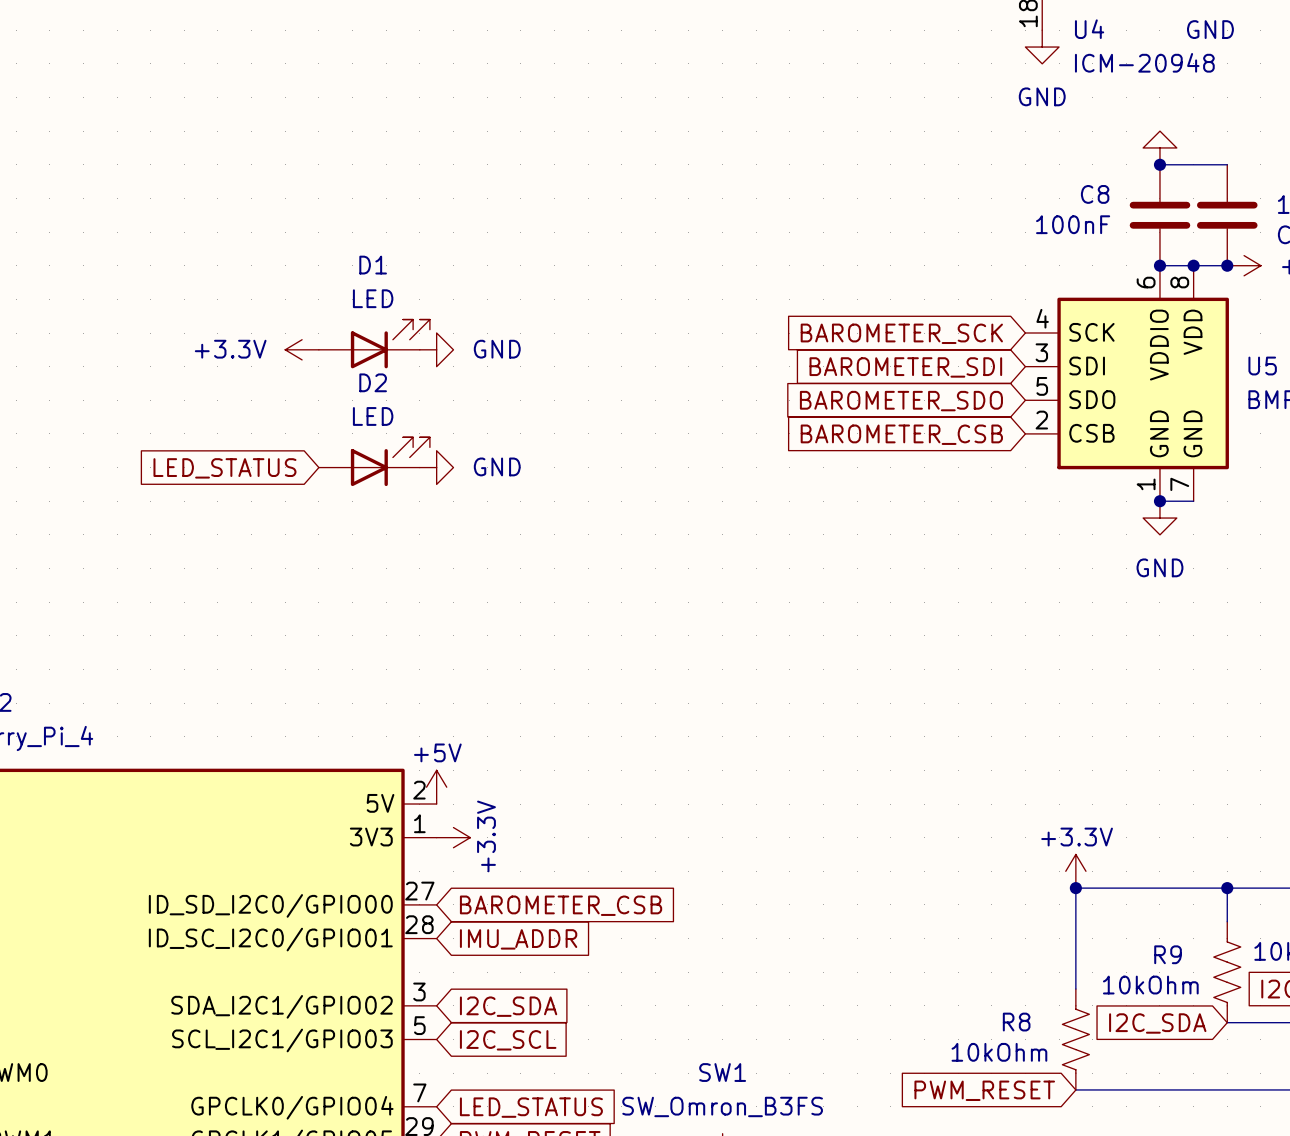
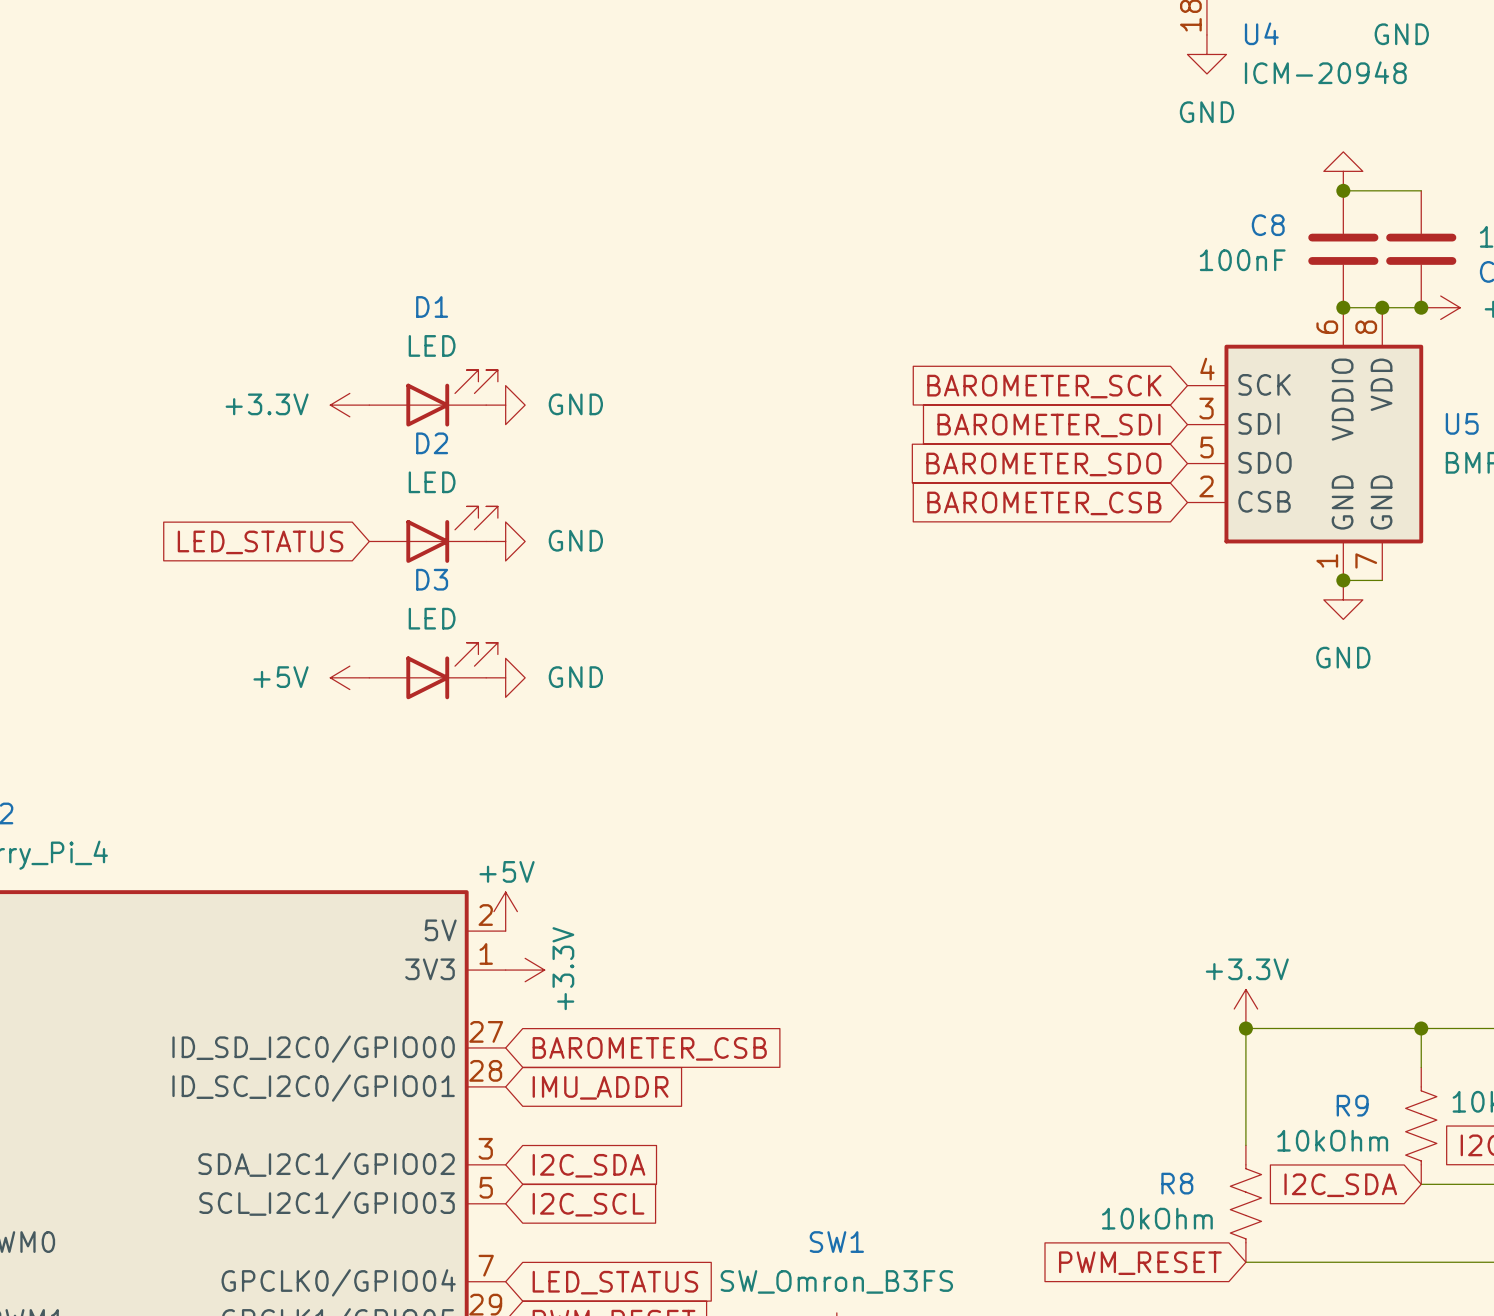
D3: none -> LED (433, 671)
power symbol: none -> +5V (349, 677)
power symbol: none -> GND (505, 677)

